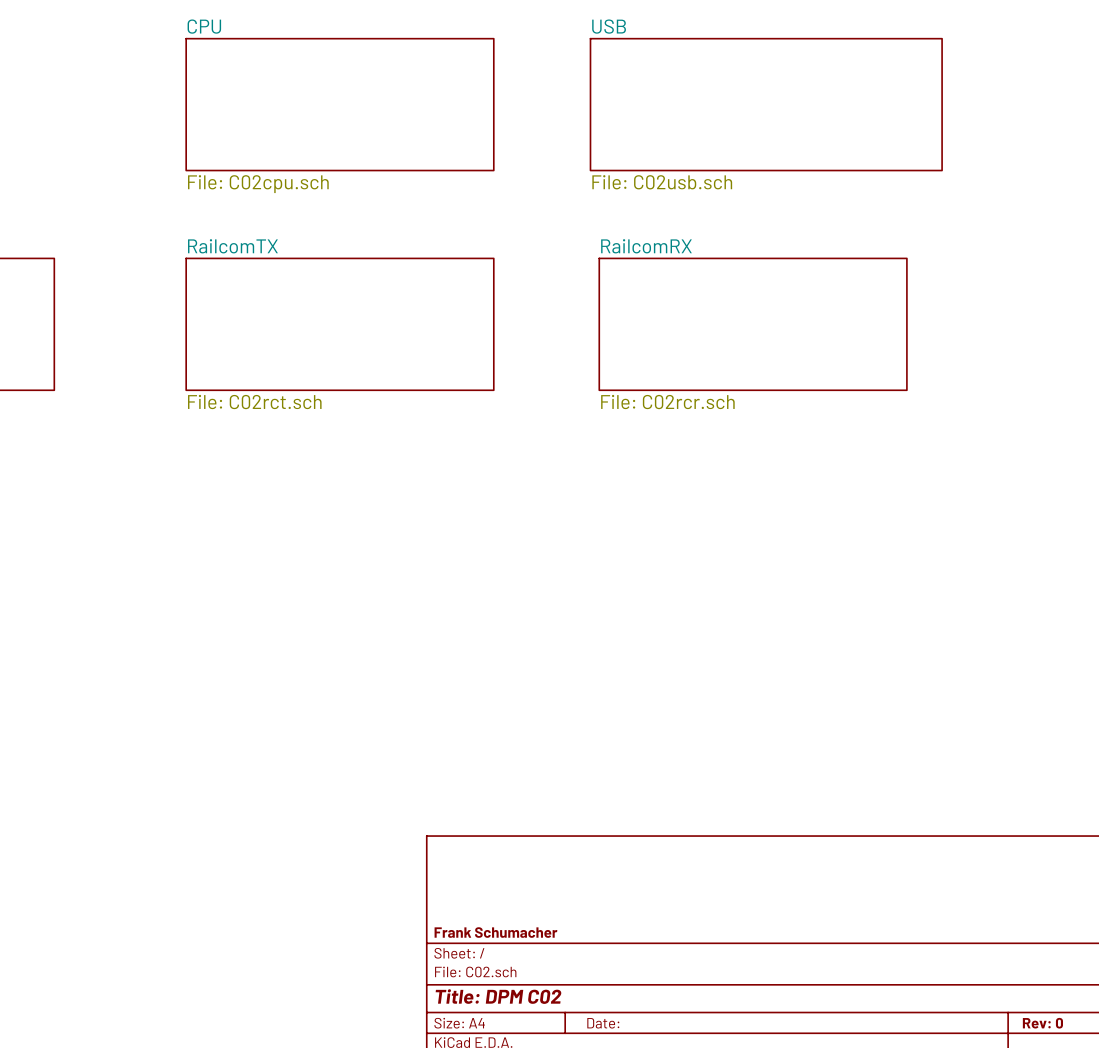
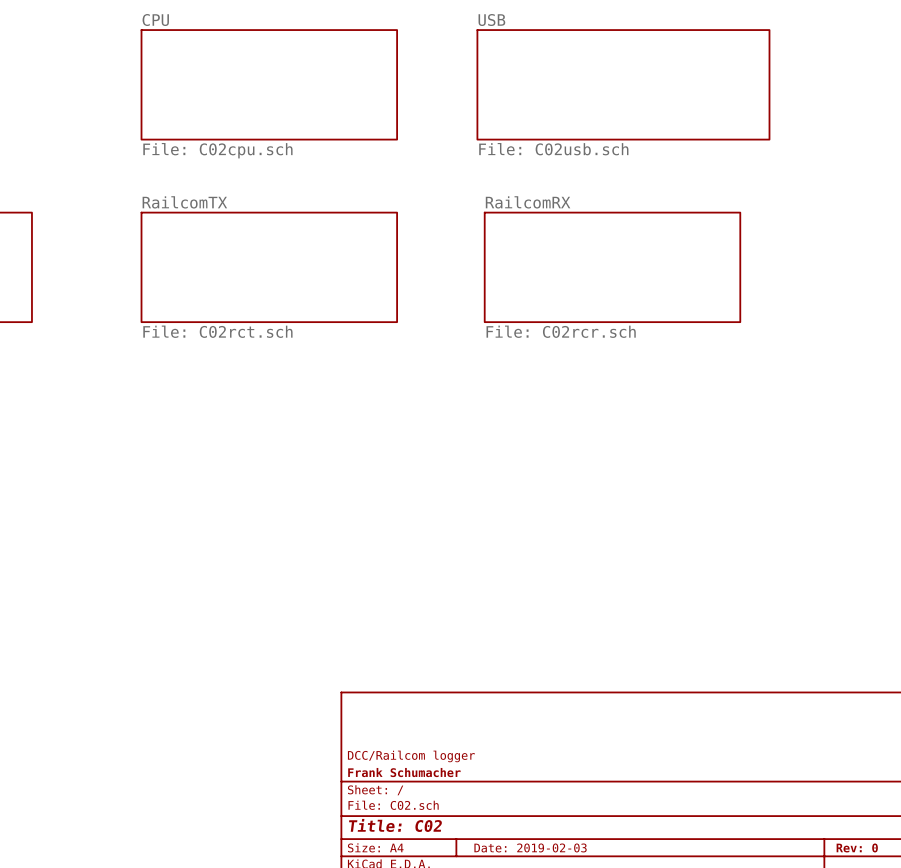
title block: none -> DCC/Railcom logger (411, 756)
title block: Title: DPM C02 (498, 996) -> Title: C02 (395, 825)
title block: Date: (603, 1023) -> Date: 2019-02-03 (530, 847)

